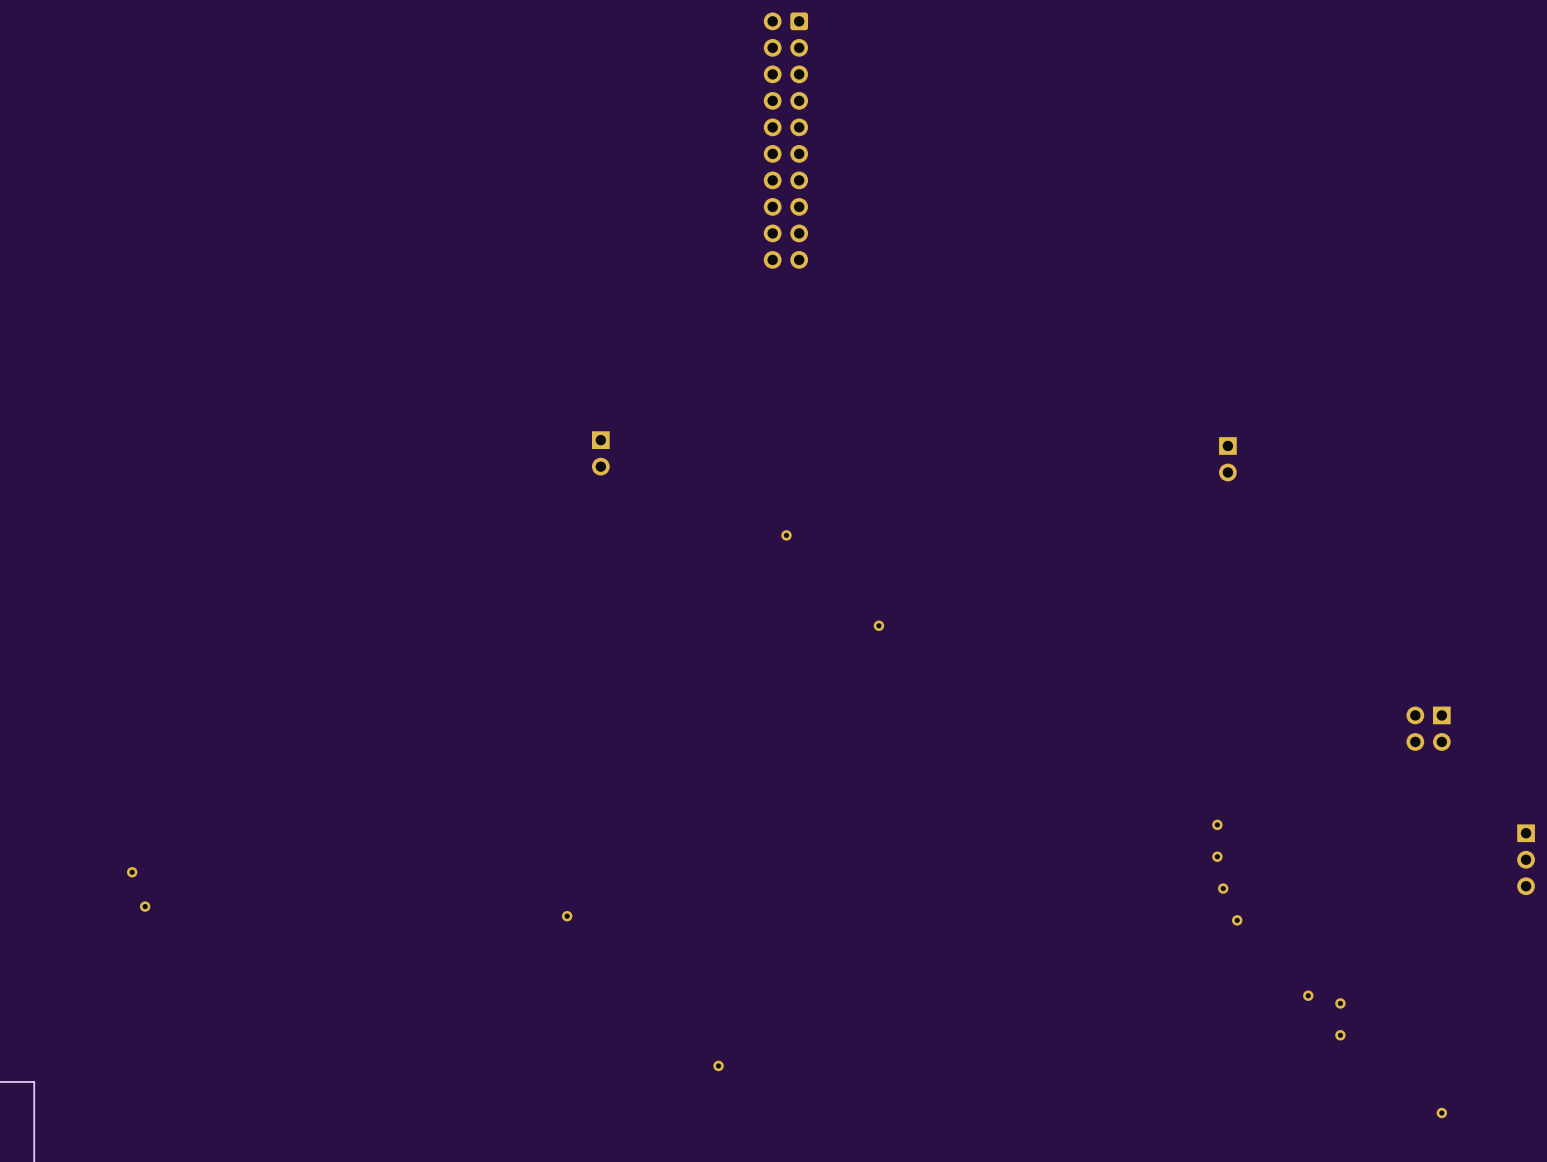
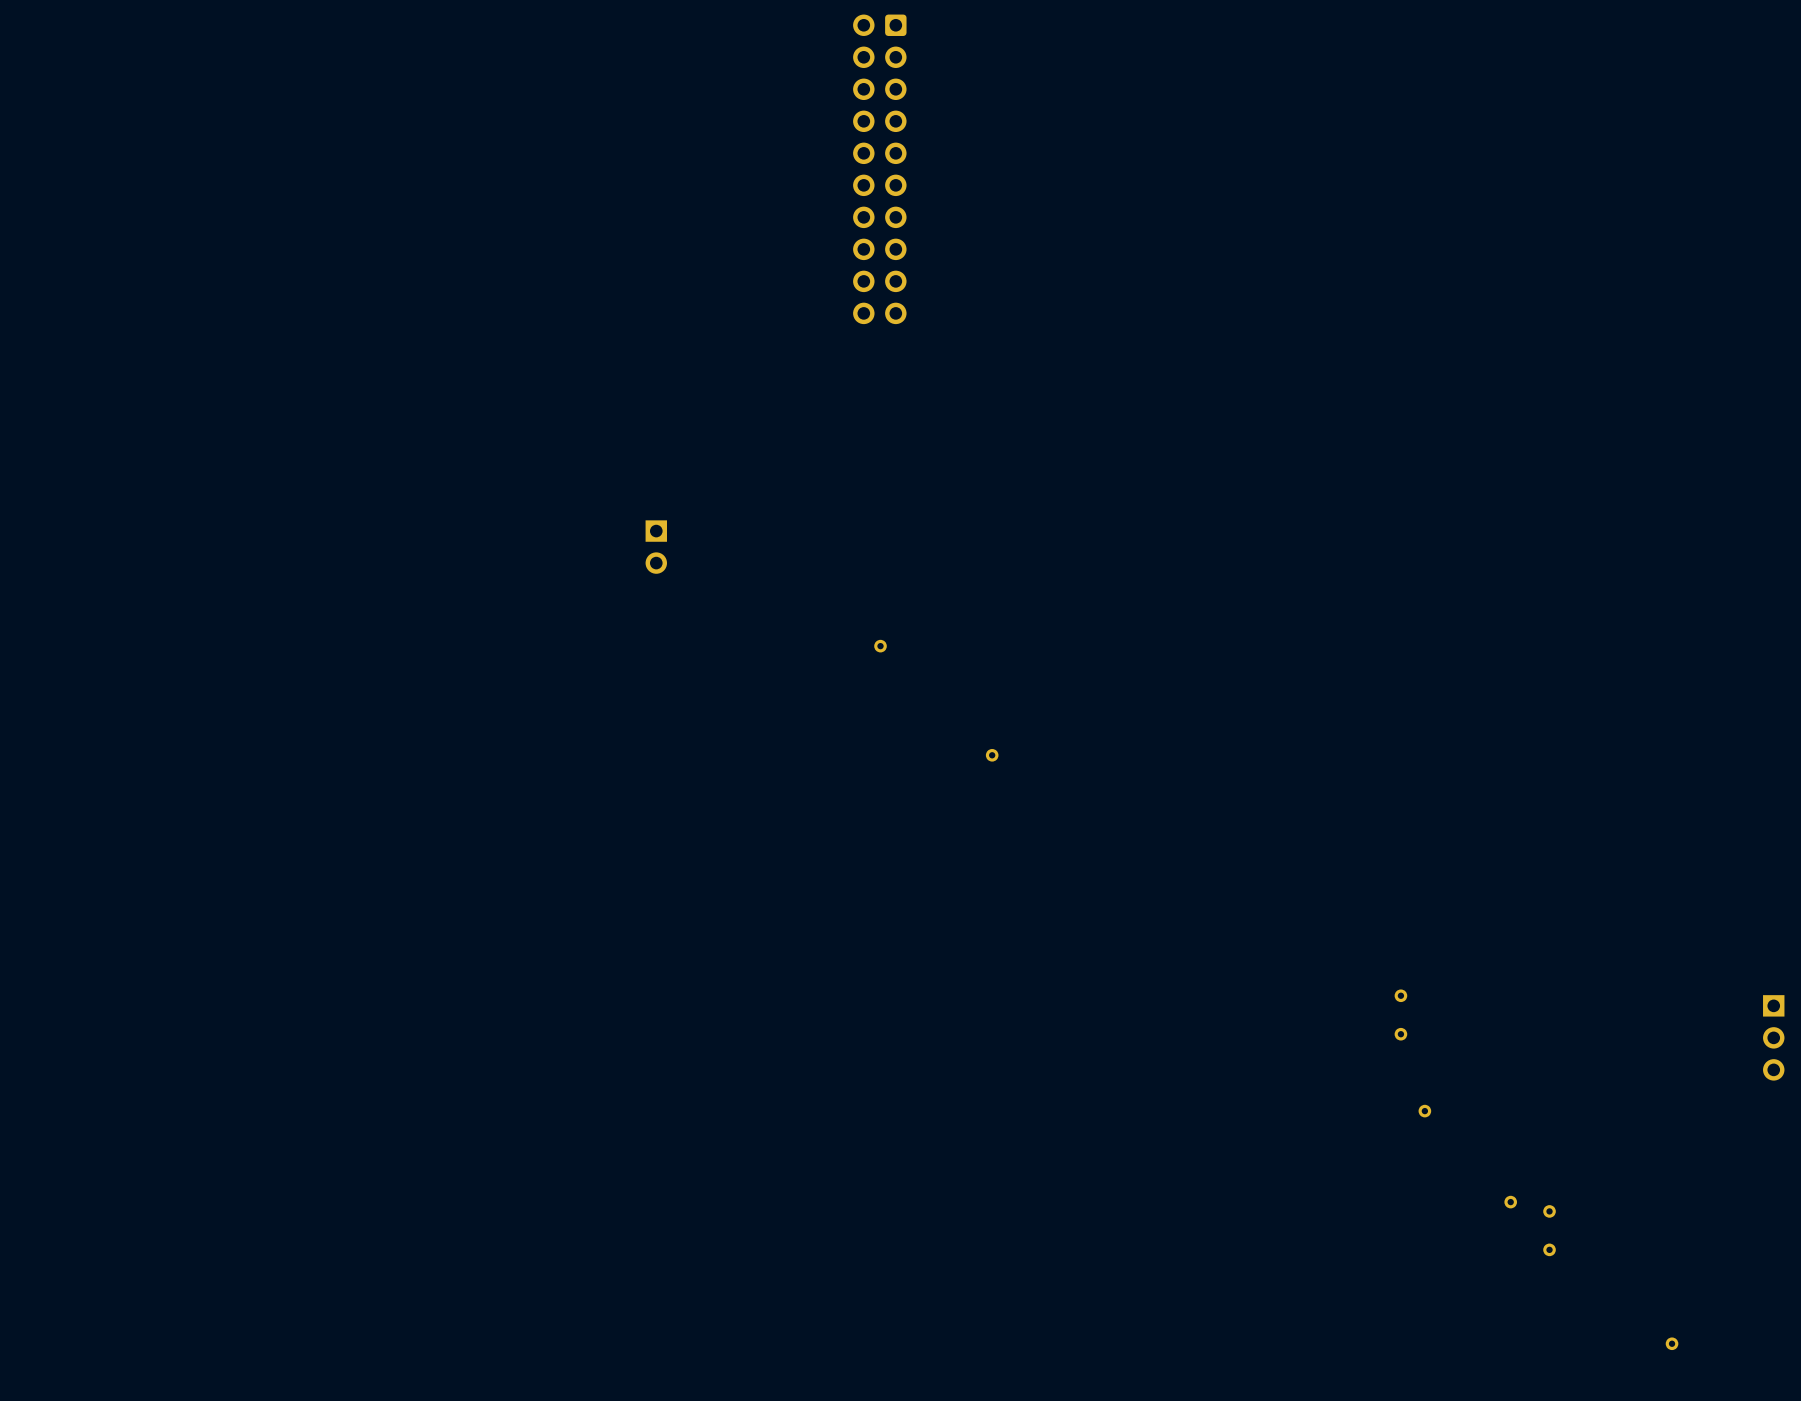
part: (1227, 459) -> none
part: (1428, 728) -> none
part: (132, 872) -> none
part: (1223, 888) -> none
part: (145, 906) -> none
part: (567, 916) -> none
part: (718, 1065) -> none

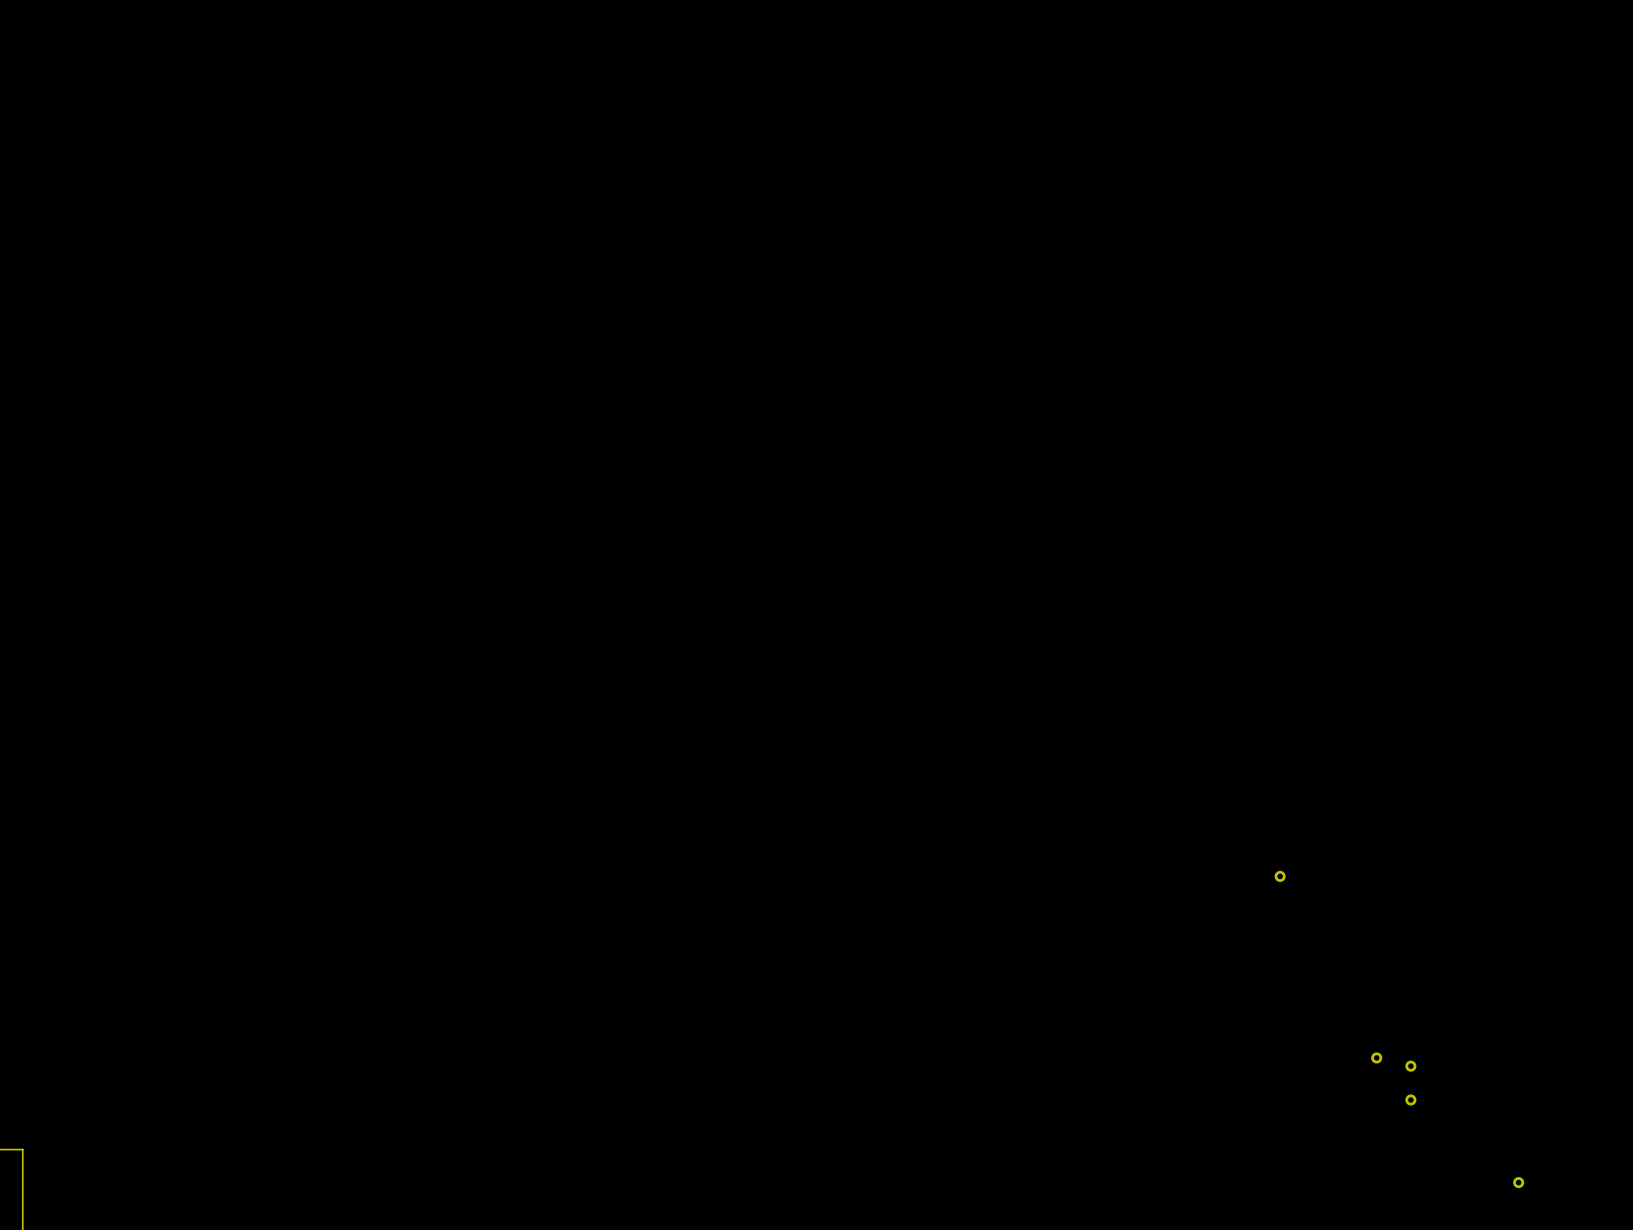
part: (879, 169) -> none
part: (656, 547) -> none
part: (880, 646) -> none
part: (992, 755) -> none
part: (1400, 1034) -> none
part: (1773, 1037) -> none
part: (1424, 1111) -> none

